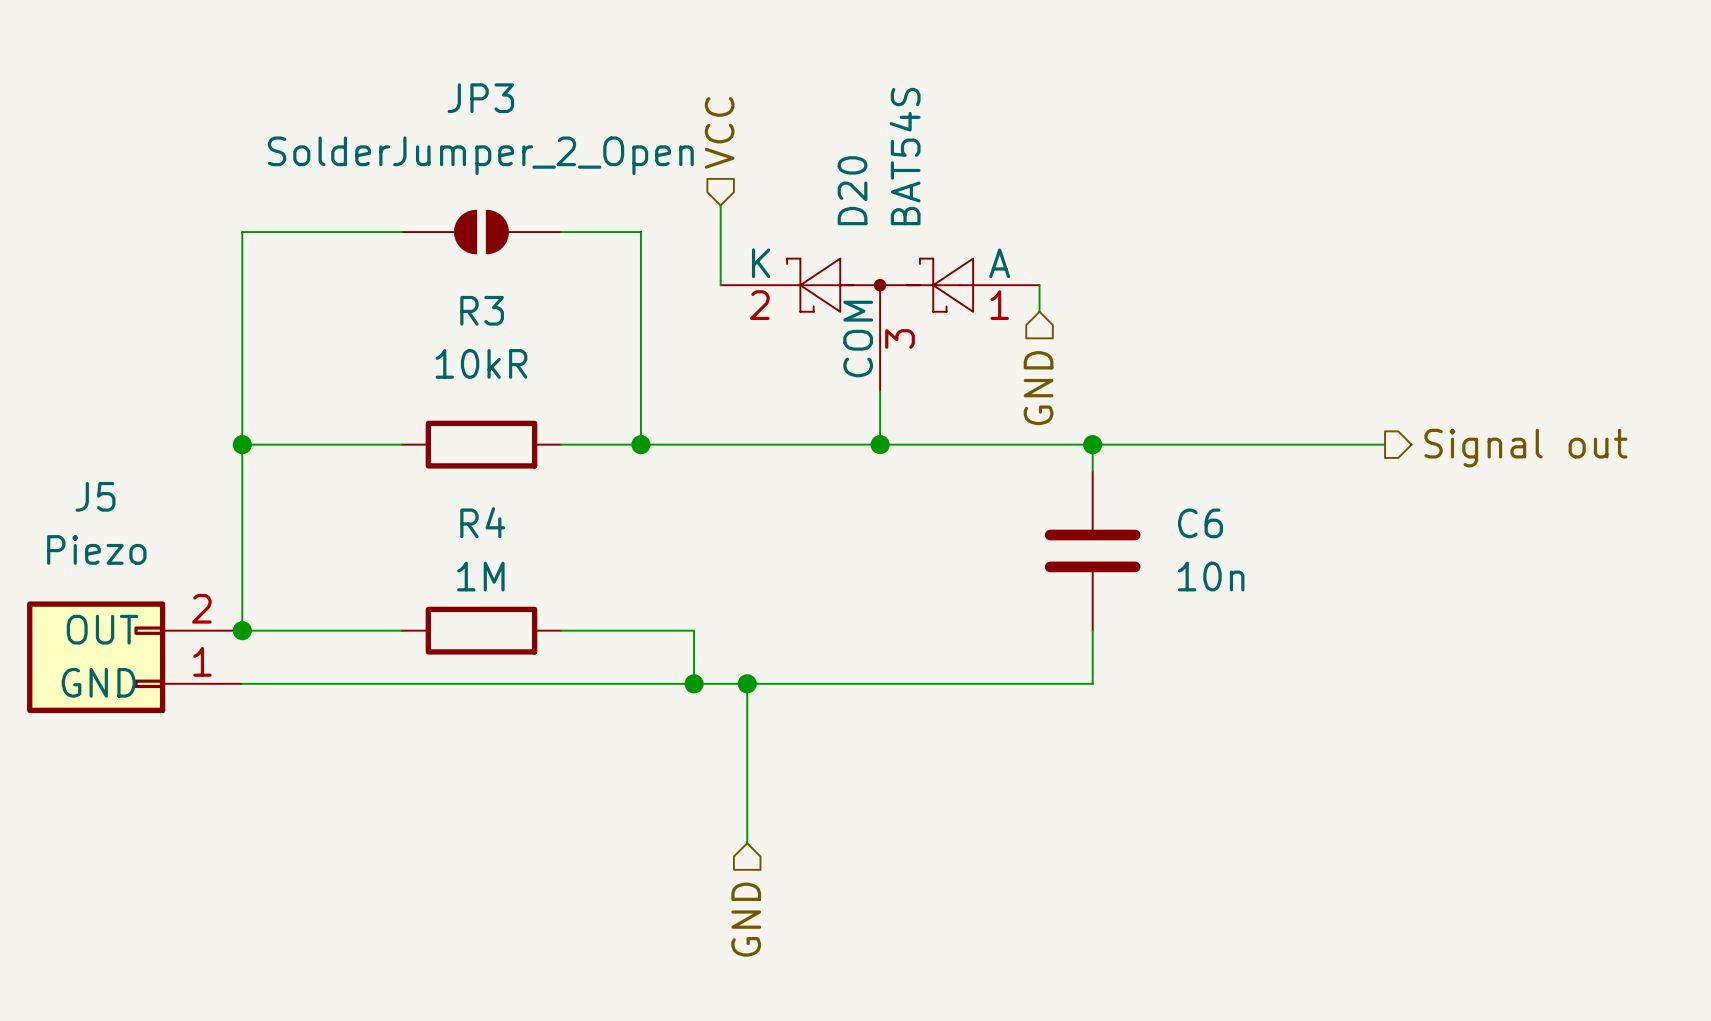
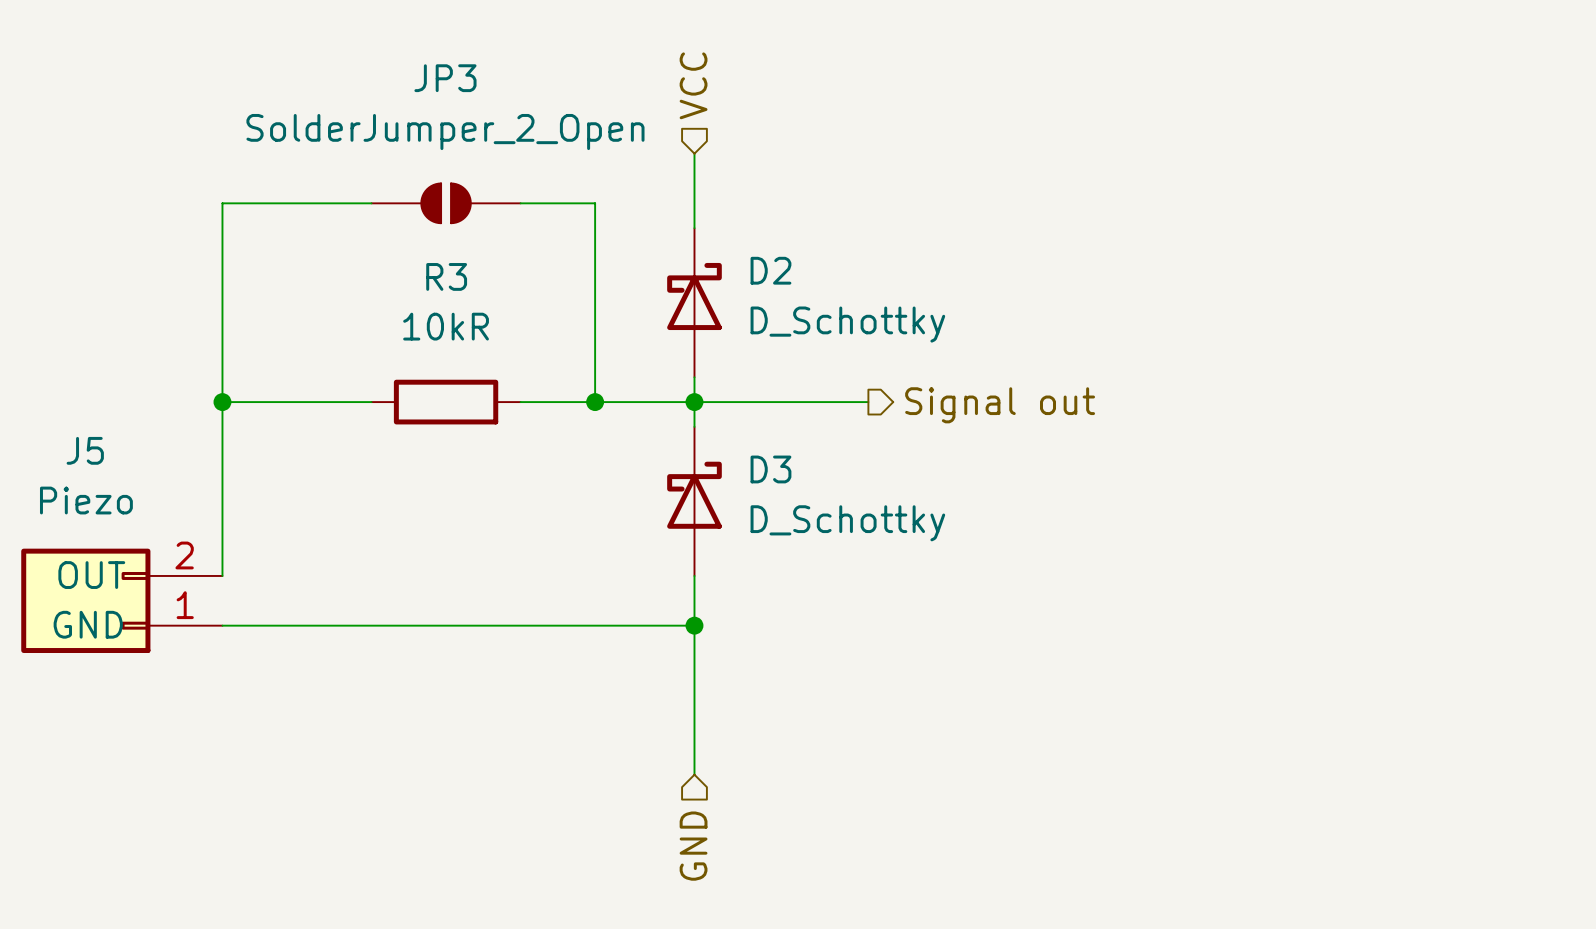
hierarchical label position: VCC (719, 132) -> VCC (693, 85)
wire: (720, 205) (720, 285) -> (694, 153) (694, 228)
wire: (1039, 285) (1039, 311) -> none
D20: BAT54S (880, 325) -> none
D2: none -> D_Schottky (694, 302)
hierarchical label: GND (1038, 388) -> none
wire: (880, 391) (880, 444) -> (694, 377) (694, 426)
junction: none -> (694, 402)
junction: (880, 444) -> none
wire: (933, 444) (1385, 444) -> none
wire: (1092, 444) (1092, 471) -> none
junction: (1092, 444) -> none
hierarchical label position: Signal out (1525, 448) -> Signal out (1000, 405)
D3: none -> D_Schottky (694, 501)
C6: 10n (1092, 550) -> none
wire: (242, 630) (401, 630) -> none
junction: (242, 630) -> none
R4: 1M (481, 630) -> none
wire: (561, 630) (694, 630) (694, 683) -> none
wire: (1092, 630) (1092, 683) (747, 683) -> (694, 575) (694, 625)
junction: (694, 683) -> none

